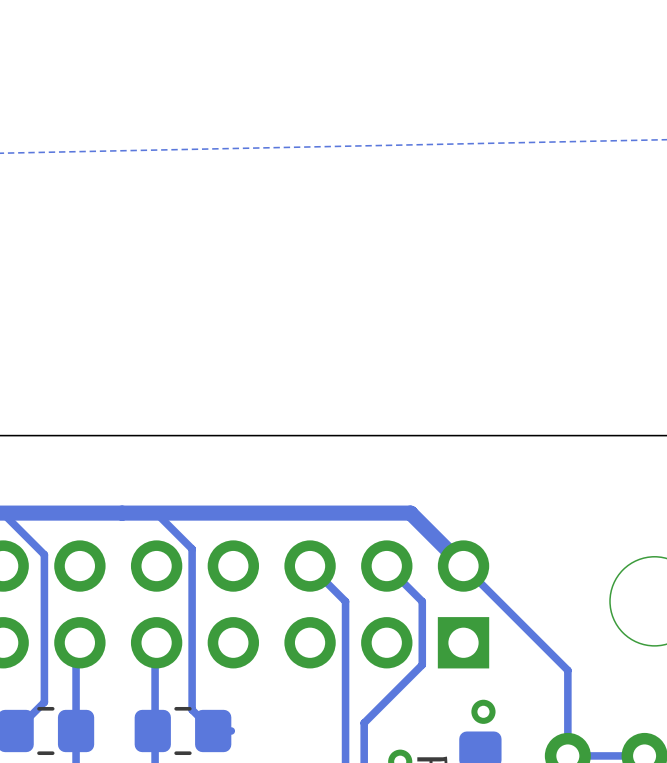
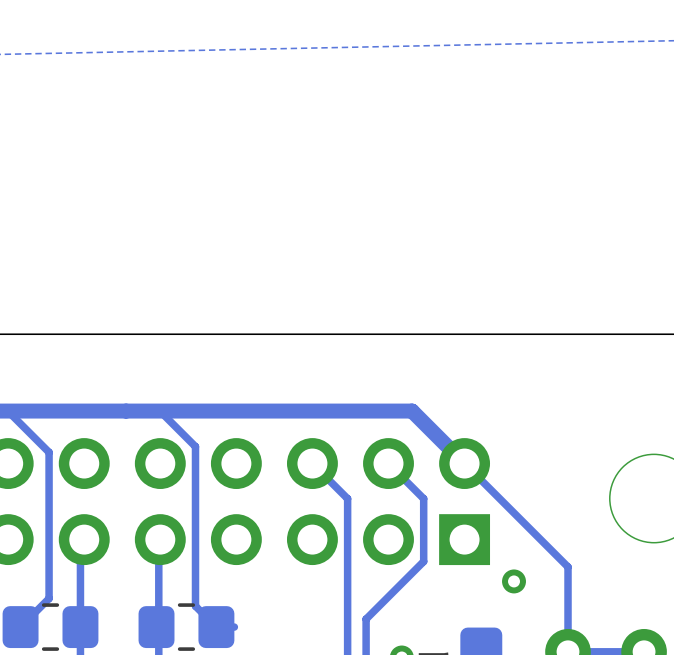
via position: (483, 711) -> (514, 581)

